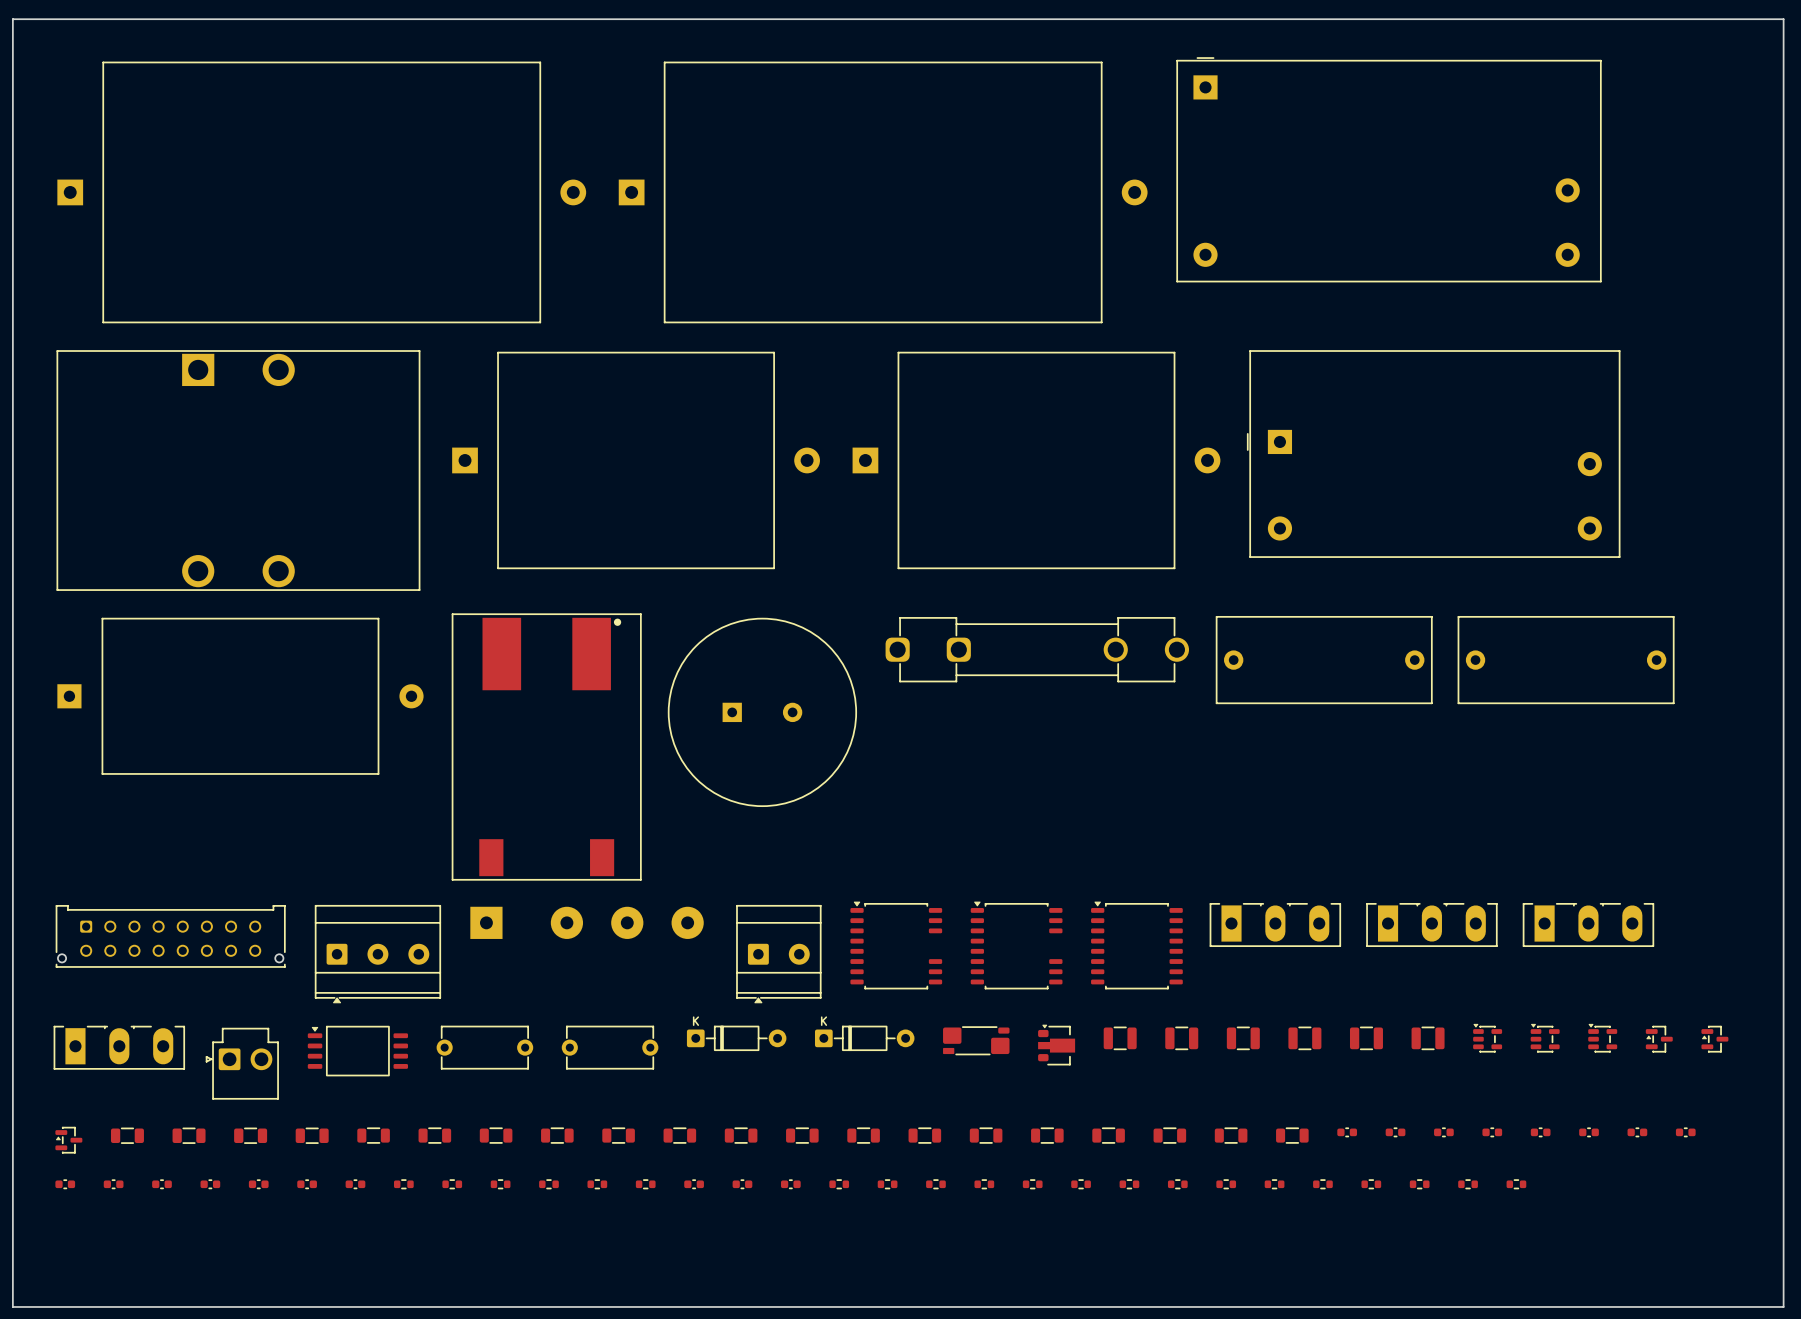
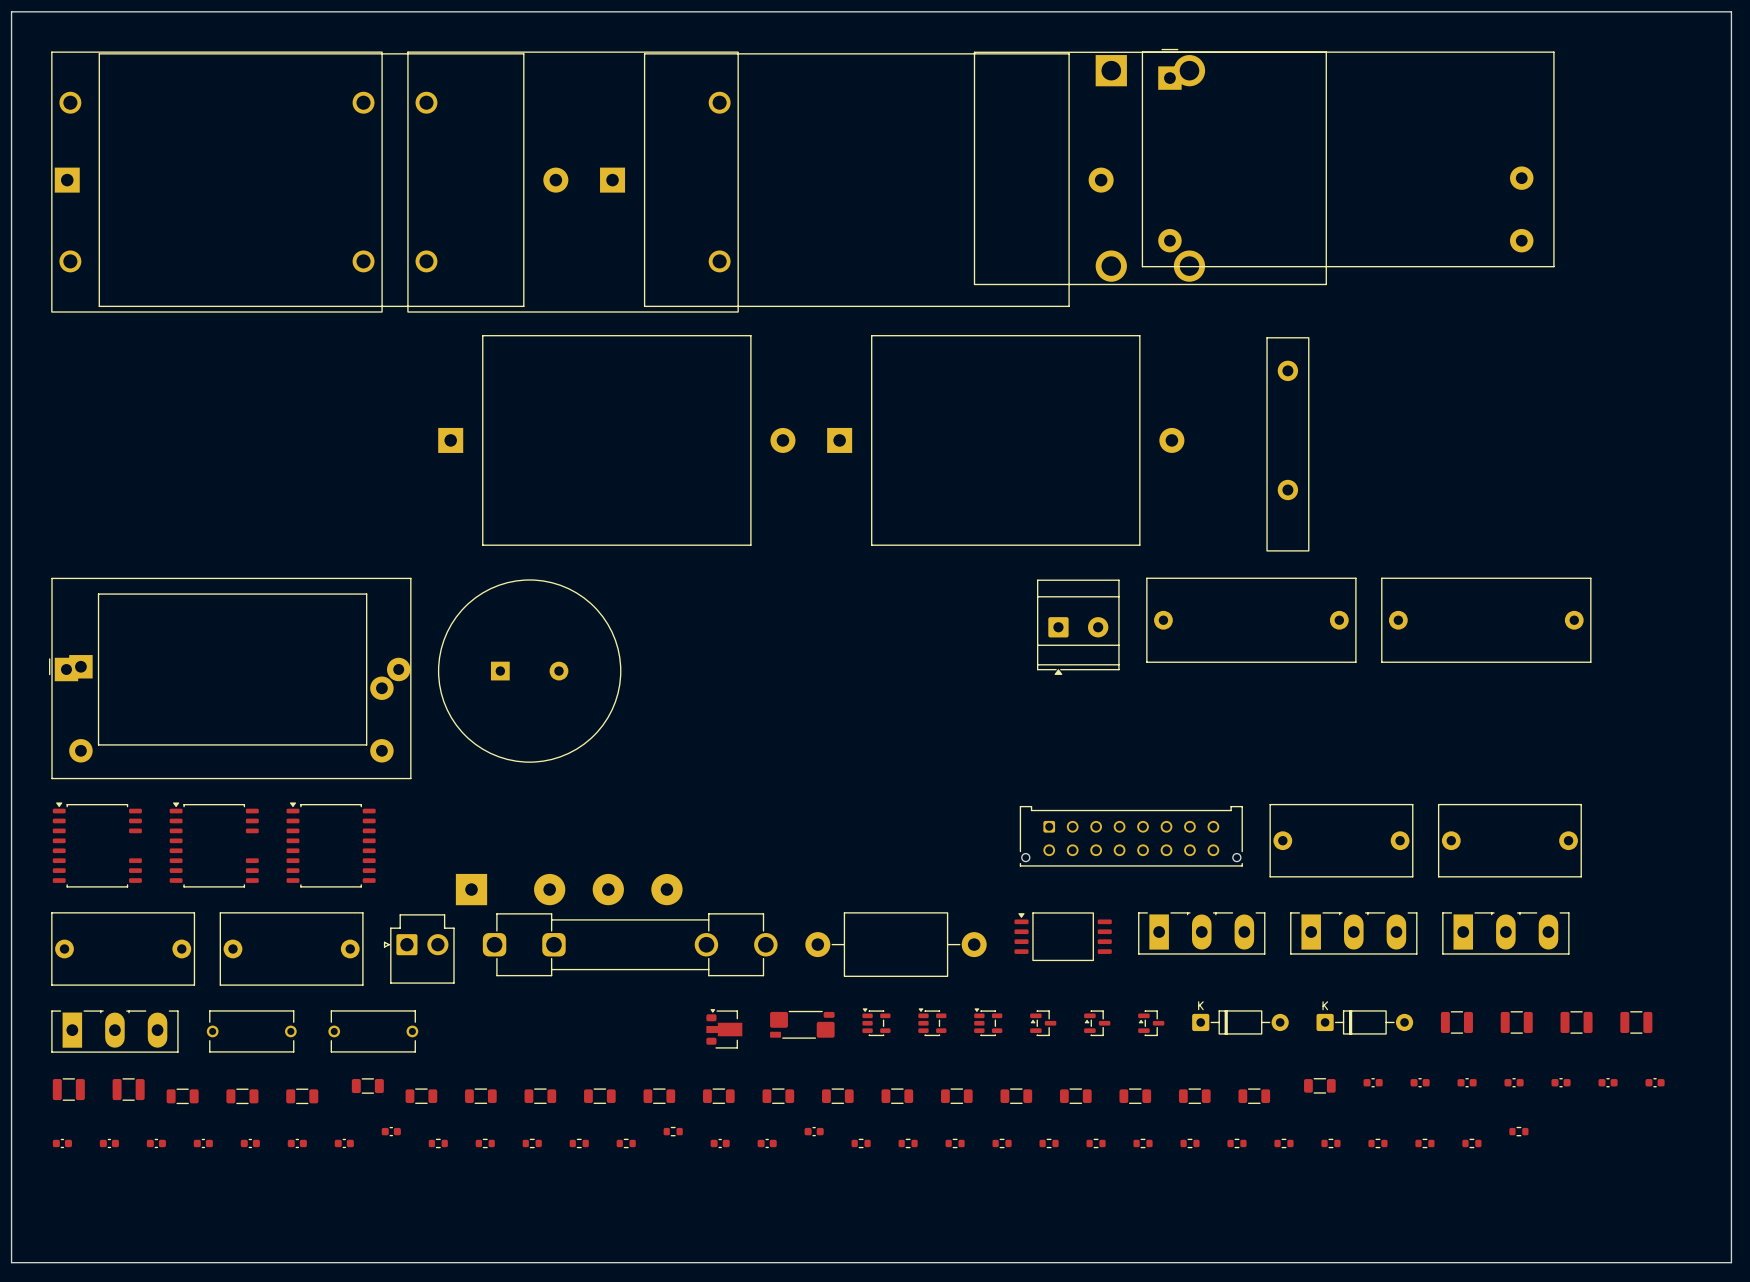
part: none -> (1150, 168)
part: none -> (216, 182)
part: none -> (573, 182)
part: (1433, 454) -> none
part: none -> (1287, 444)
part: (238, 470) -> none
part: (1037, 649) -> none
part: none -> (1078, 627)
part position: (1324, 660) -> (1251, 620)
part position: (1566, 660) -> (1486, 620)
part: none -> (529, 671)
part: none -> (230, 678)
part: (762, 712) -> none
part: (546, 747) -> none
part: none -> (1131, 836)
part: none -> (1341, 840)
part: none -> (1509, 840)
part: none -> (97, 844)
part: none -> (214, 844)
part: none -> (331, 844)
part position: (1275, 924) -> (1201, 933)
part position: (1431, 924) -> (1353, 933)
part position: (1588, 924) -> (1505, 933)
part: (170, 936) -> none
part: (896, 945) -> none
part: (1016, 945) -> none
part: (1136, 945) -> none
part: (377, 954) -> none
part: (778, 954) -> none
part: none -> (1063, 936)
part: none -> (630, 944)
part: none -> (896, 944)
part: none -> (123, 948)
part: none -> (291, 948)
part: none -> (419, 948)
part: (736, 1038) -> none
part: (864, 1038) -> none
part: (1120, 1038) -> none
part: (1181, 1038) -> none
part: (1243, 1038) -> none
part: (1304, 1038) -> none
part: (1366, 1038) -> none
part: (1428, 1038) -> none
part: (1487, 1038) -> none
part: (1545, 1038) -> none
part: (1602, 1038) -> none
part: (1659, 1039) -> none
part: (1714, 1039) -> none
part position: (976, 1040) -> (802, 1024)
part: (1056, 1044) -> none
part position: (119, 1047) -> (114, 1031)
part: (484, 1047) -> none
part: (610, 1047) -> none
part: (357, 1051) -> none
part: none -> (876, 1022)
part: none -> (932, 1022)
part: none -> (988, 1022)
part: none -> (1240, 1022)
part: none -> (1364, 1022)
part: none -> (1456, 1022)
part: none -> (1516, 1022)
part: none -> (1576, 1022)
part: none -> (1636, 1022)
part: none -> (1043, 1023)
part: none -> (1097, 1023)
part: none -> (1151, 1023)
part: (242, 1063) -> none
part: none -> (724, 1028)
part: none -> (251, 1031)
part: none -> (373, 1031)
part: none -> (1373, 1082)
part: none -> (1420, 1082)
part: none -> (1467, 1082)
part: none -> (1514, 1082)
part: none -> (1561, 1082)
part: none -> (1608, 1082)
part: none -> (1655, 1082)
part: none -> (1319, 1085)
part: none -> (367, 1086)
part: none -> (68, 1089)
part: none -> (128, 1089)
part: (1347, 1132) -> none
part: (1395, 1132) -> none
part: (1443, 1132) -> none
part: (1492, 1132) -> none
part: (1540, 1132) -> none
part: (1589, 1132) -> none
part: (1637, 1132) -> none
part: (1685, 1132) -> none
part: (127, 1135) -> none
part: (373, 1135) -> none
part: (68, 1140) -> none
part: none -> (391, 1131)
part: none -> (673, 1131)
part: none -> (814, 1131)
part: none -> (1518, 1131)
part: (403, 1184) -> none
part: (694, 1184) -> none
part: (839, 1184) -> none

